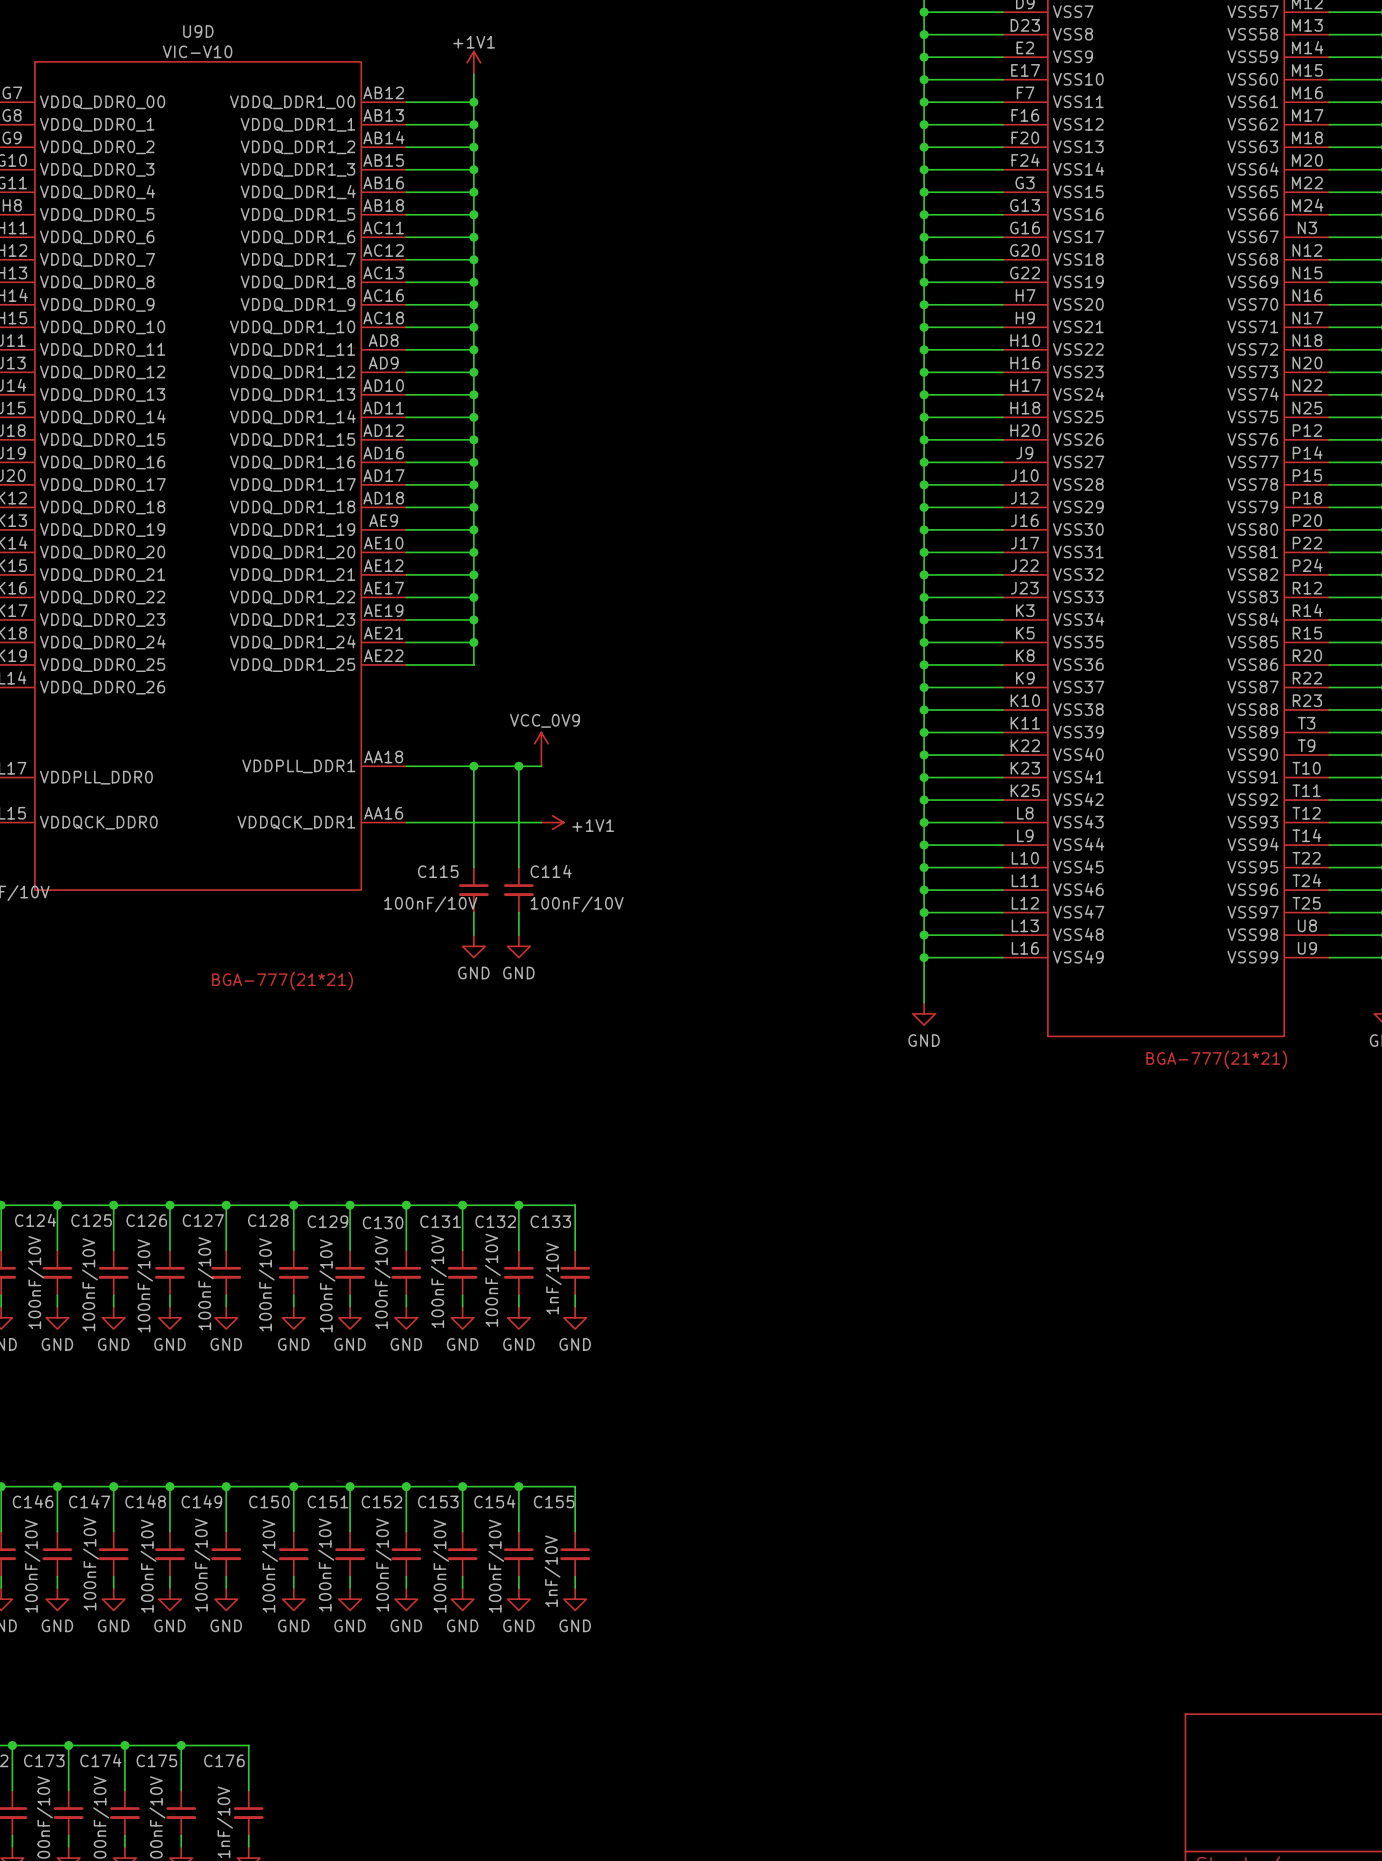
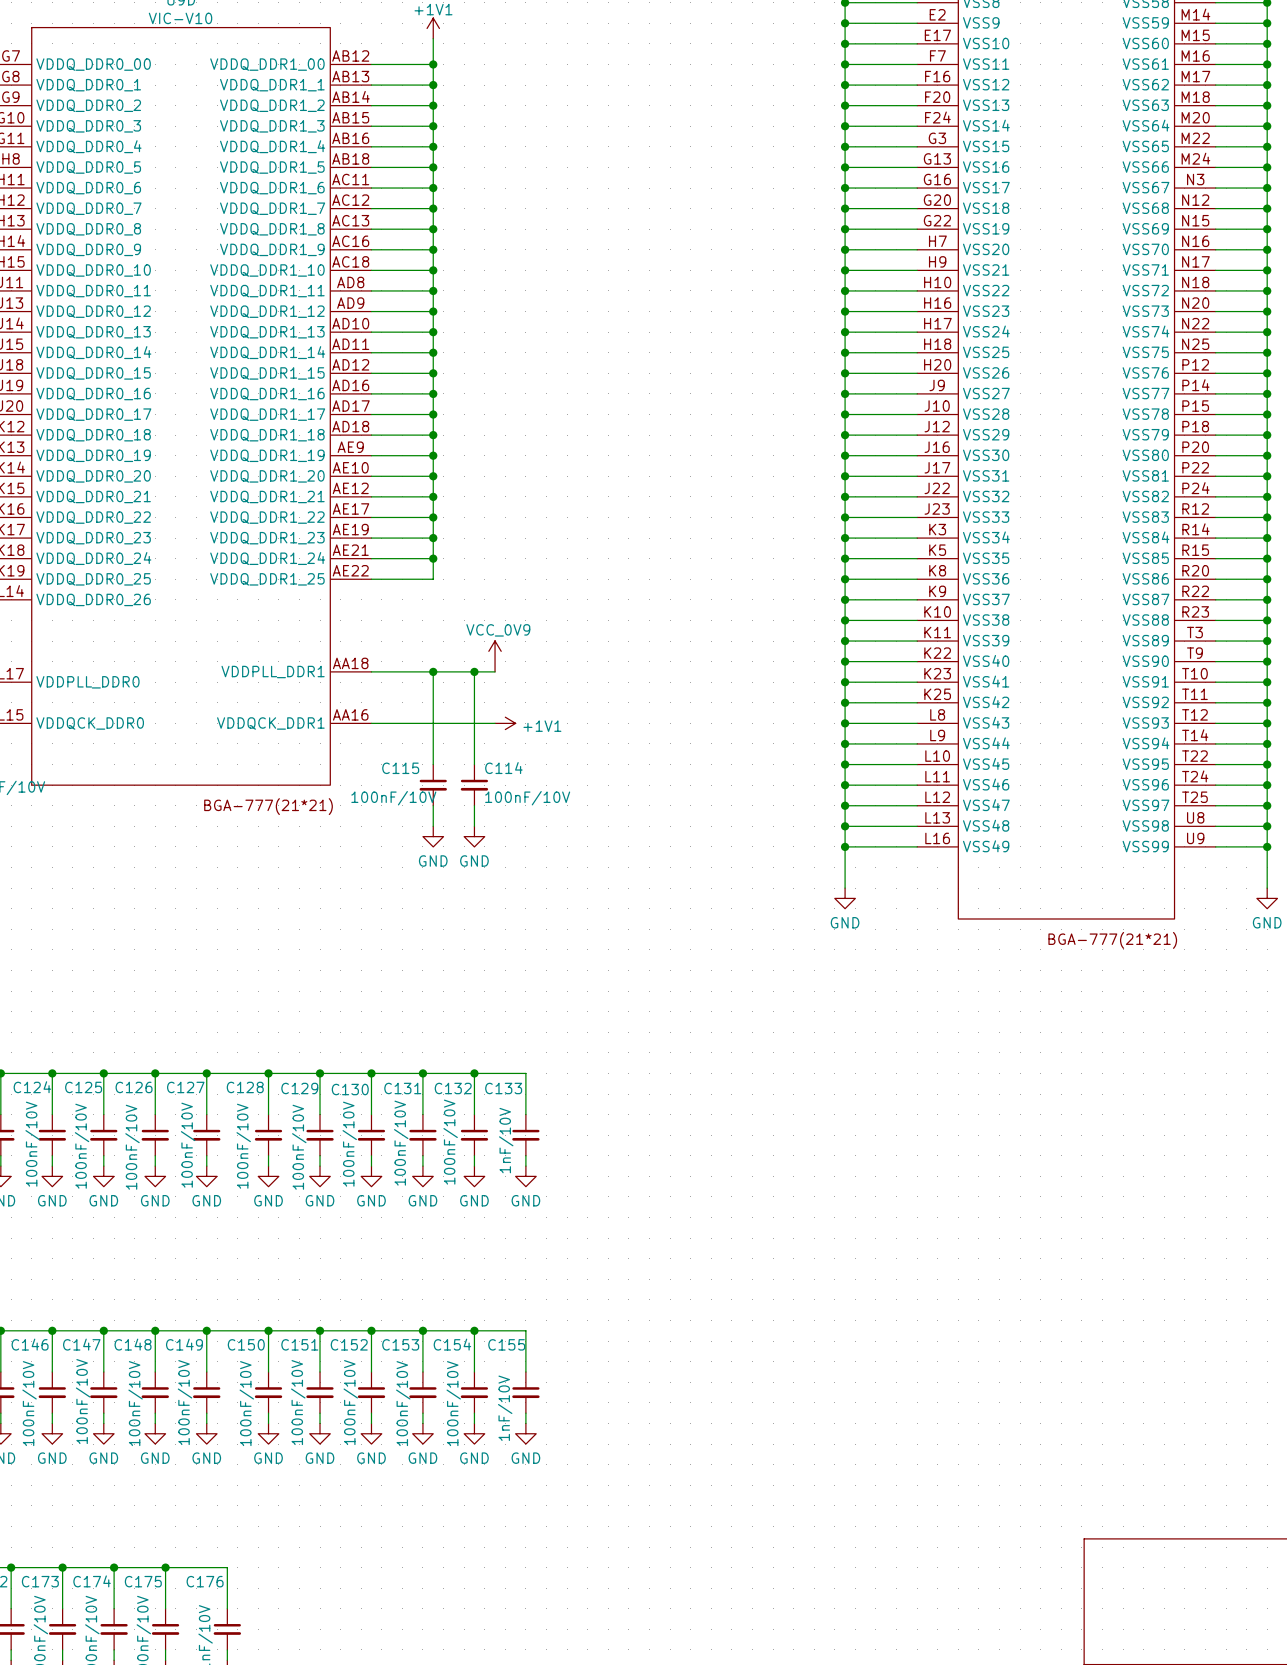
U9D text position: BGA-777(21*21) (282, 981) -> BGA-777(21*21) (268, 806)

